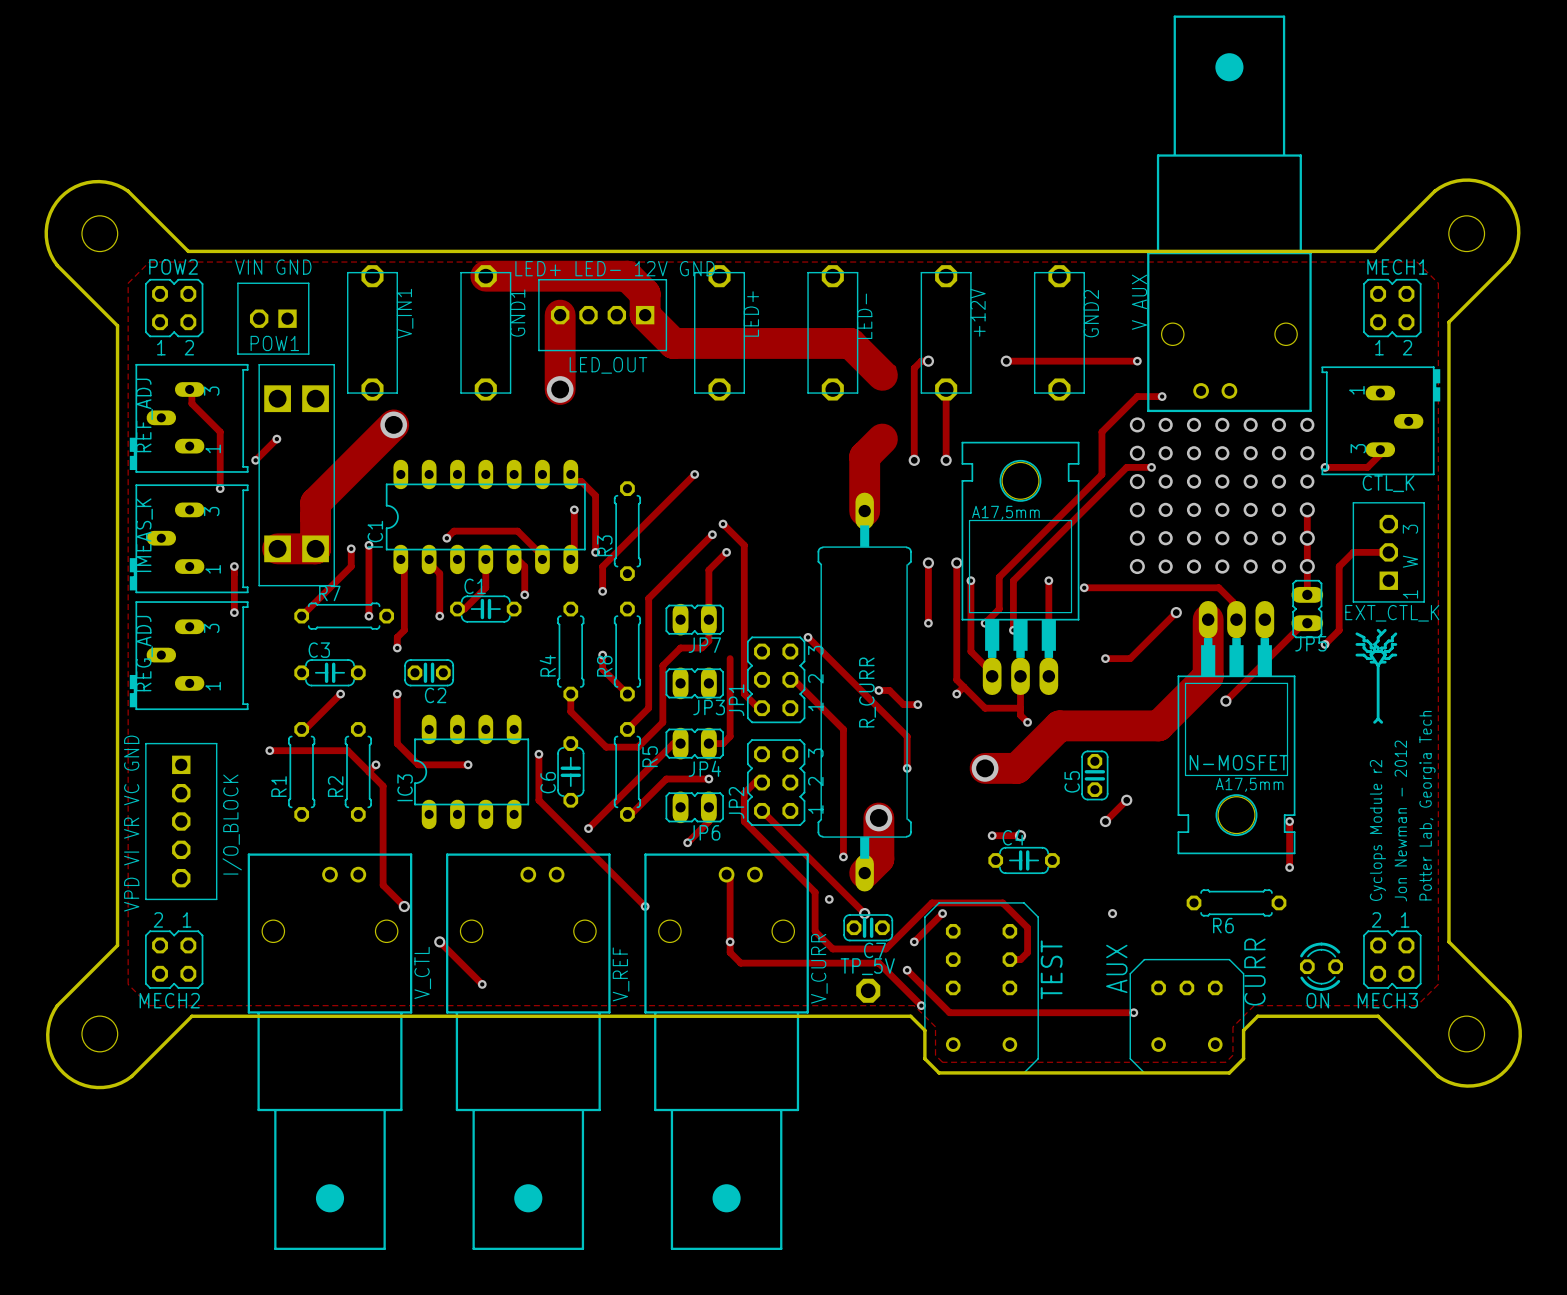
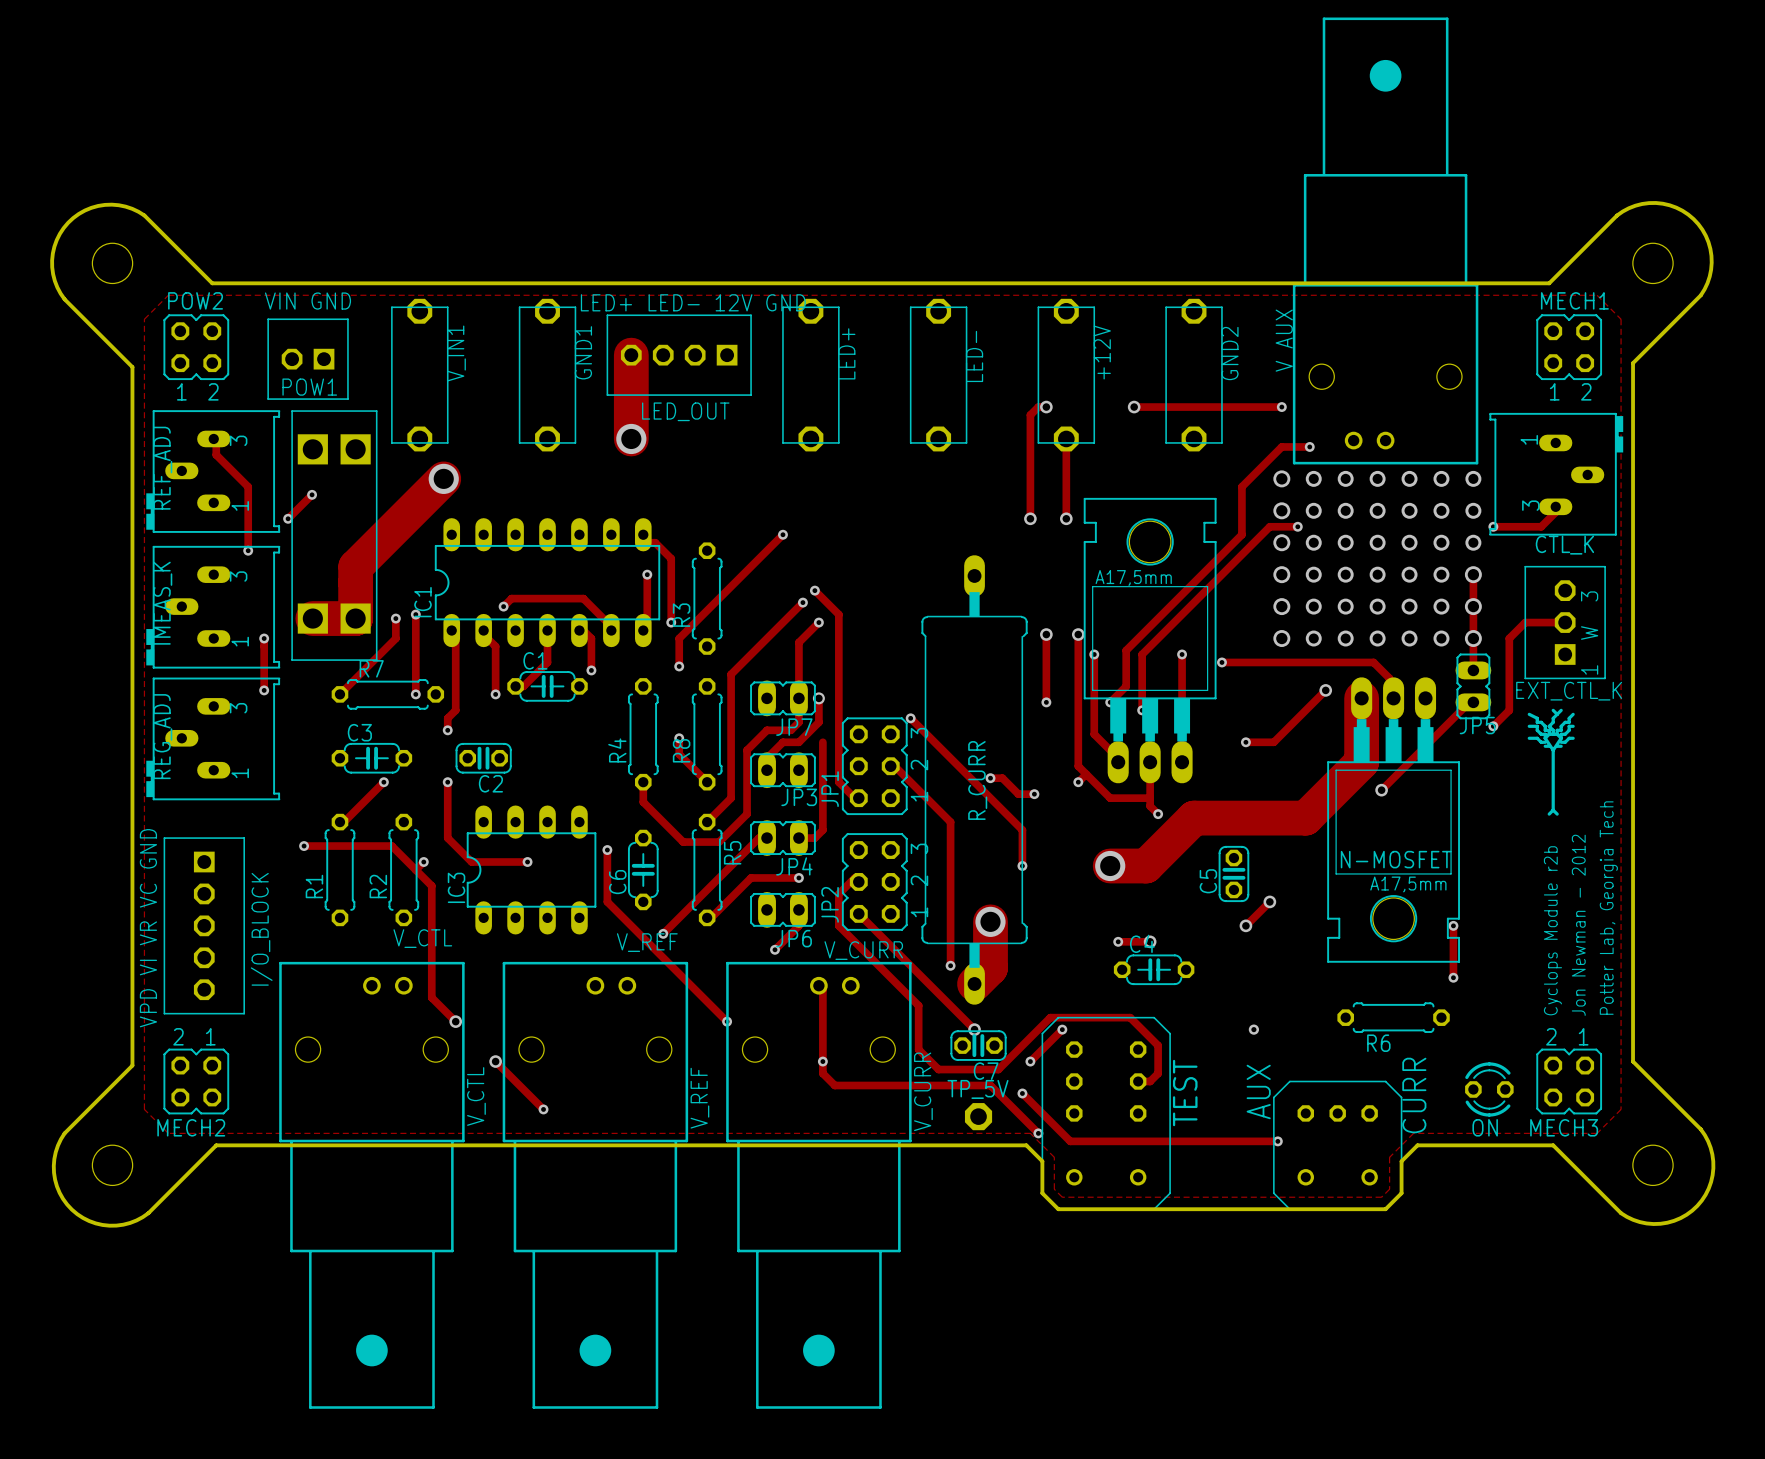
track: (485, 276) (627, 276) (645, 293) (645, 315) (673, 343) (850, 343) (882, 375) (893, 368) -> none
track: (882, 439) (864, 456) (864, 511) -> none
track: none -> (818, 698) (818, 722) (798, 742) (782, 742) (767, 758) (767, 770)
via: none -> (818, 698)
text: Cyclops Module r2 (1377, 830) -> Cyclops Module r2b (1552, 930)
text: none -> V_CTL (422, 938)
text: none -> V_REF (647, 942)
text: none -> V_CURR (863, 950)
via: (829, 899) -> none

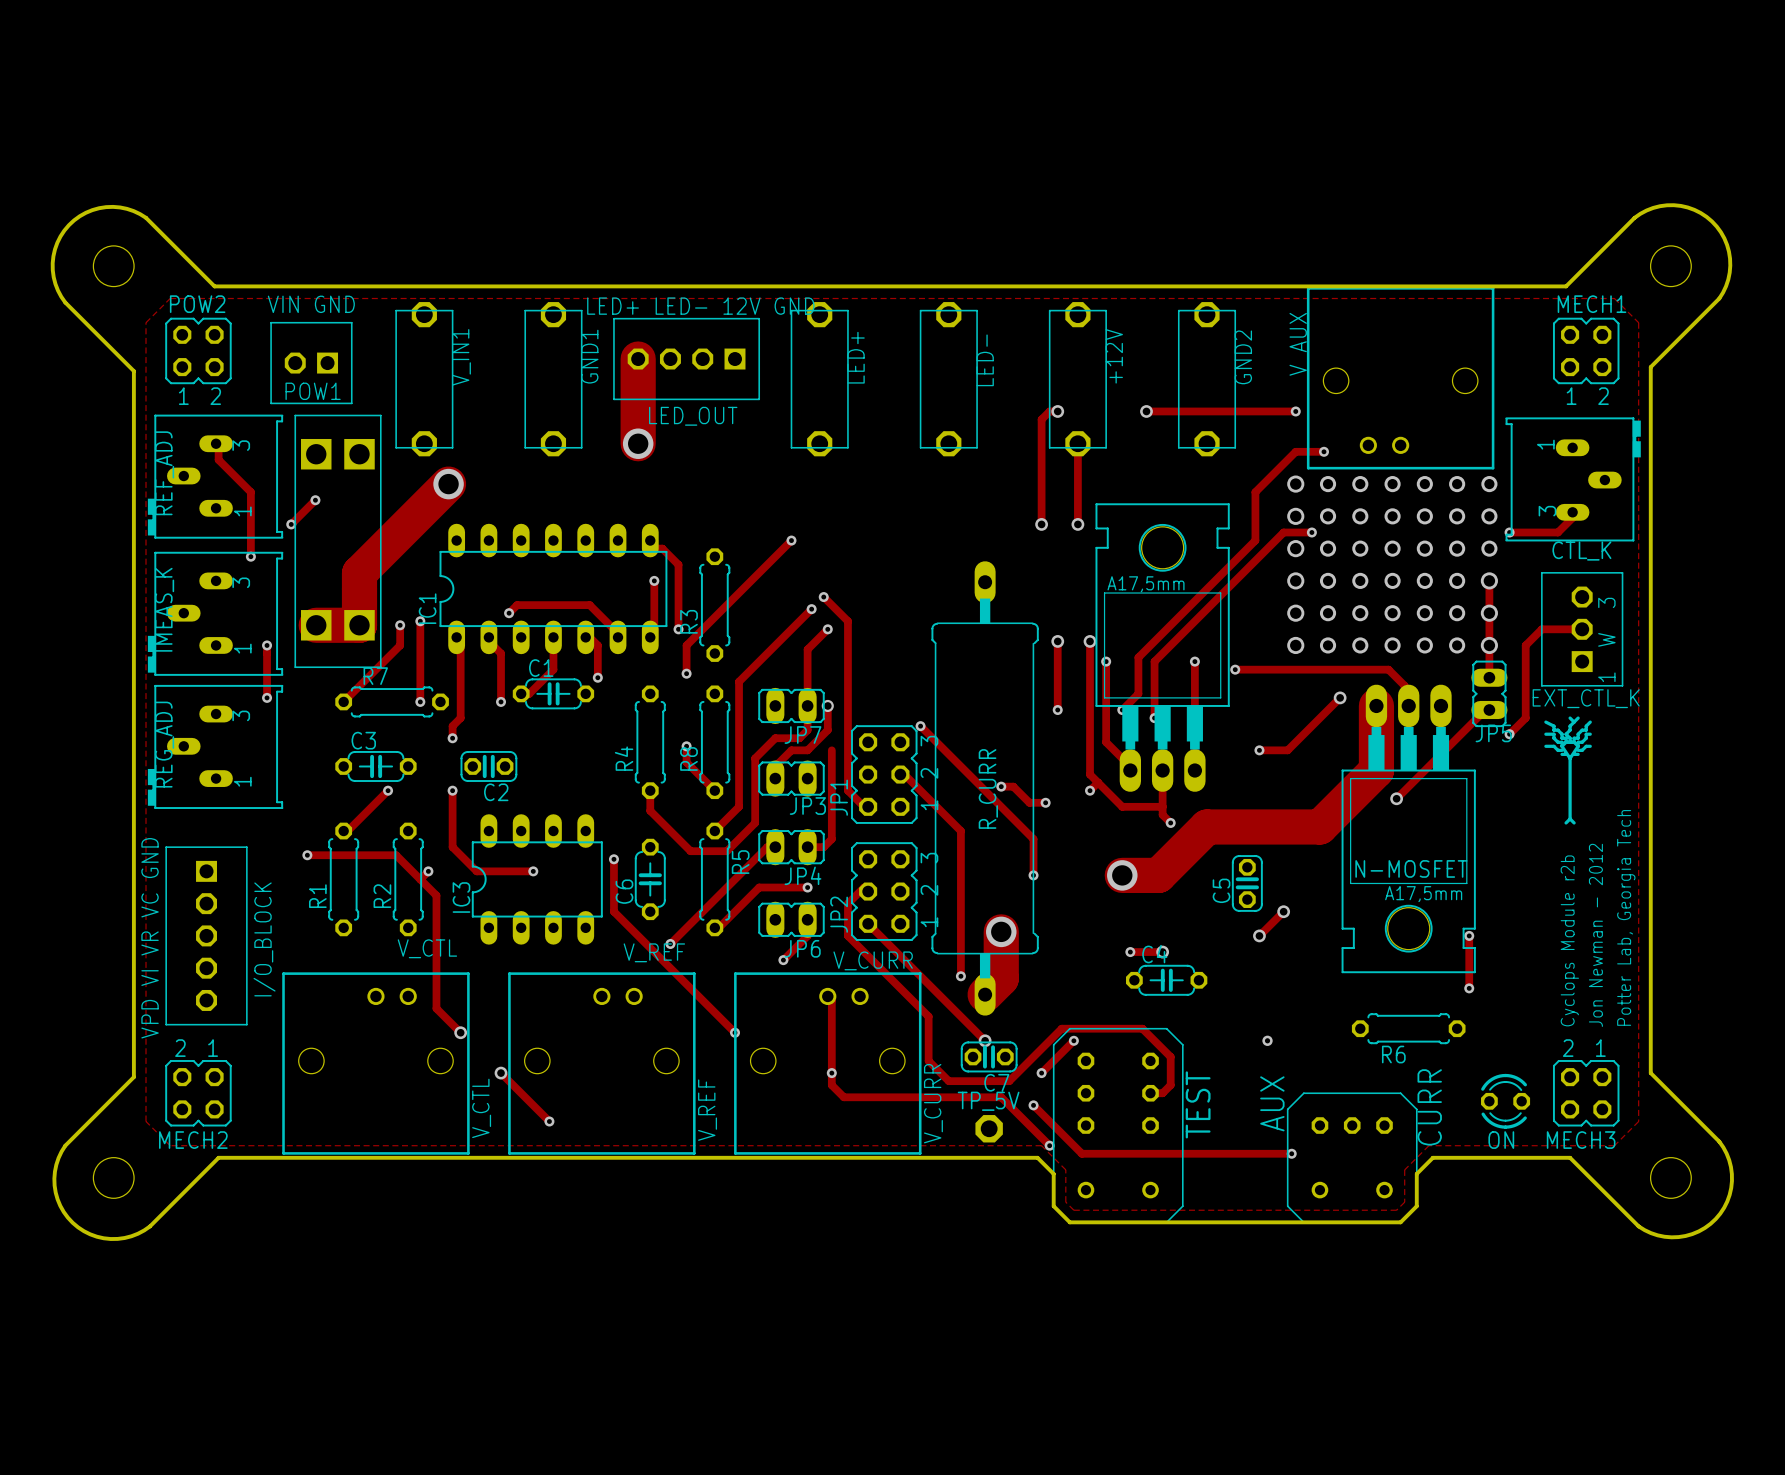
V_AUX: (1385, 240) -> none
V_AUX: none -> (1400, 378)
V_CTL: none -> (375, 1063)
V_REF: none -> (601, 1063)
V_CURR: none -> (827, 1063)
V_CTL: (371, 1185) -> none
V_REF: (595, 1185) -> none
V_CURR: (818, 1185) -> none

